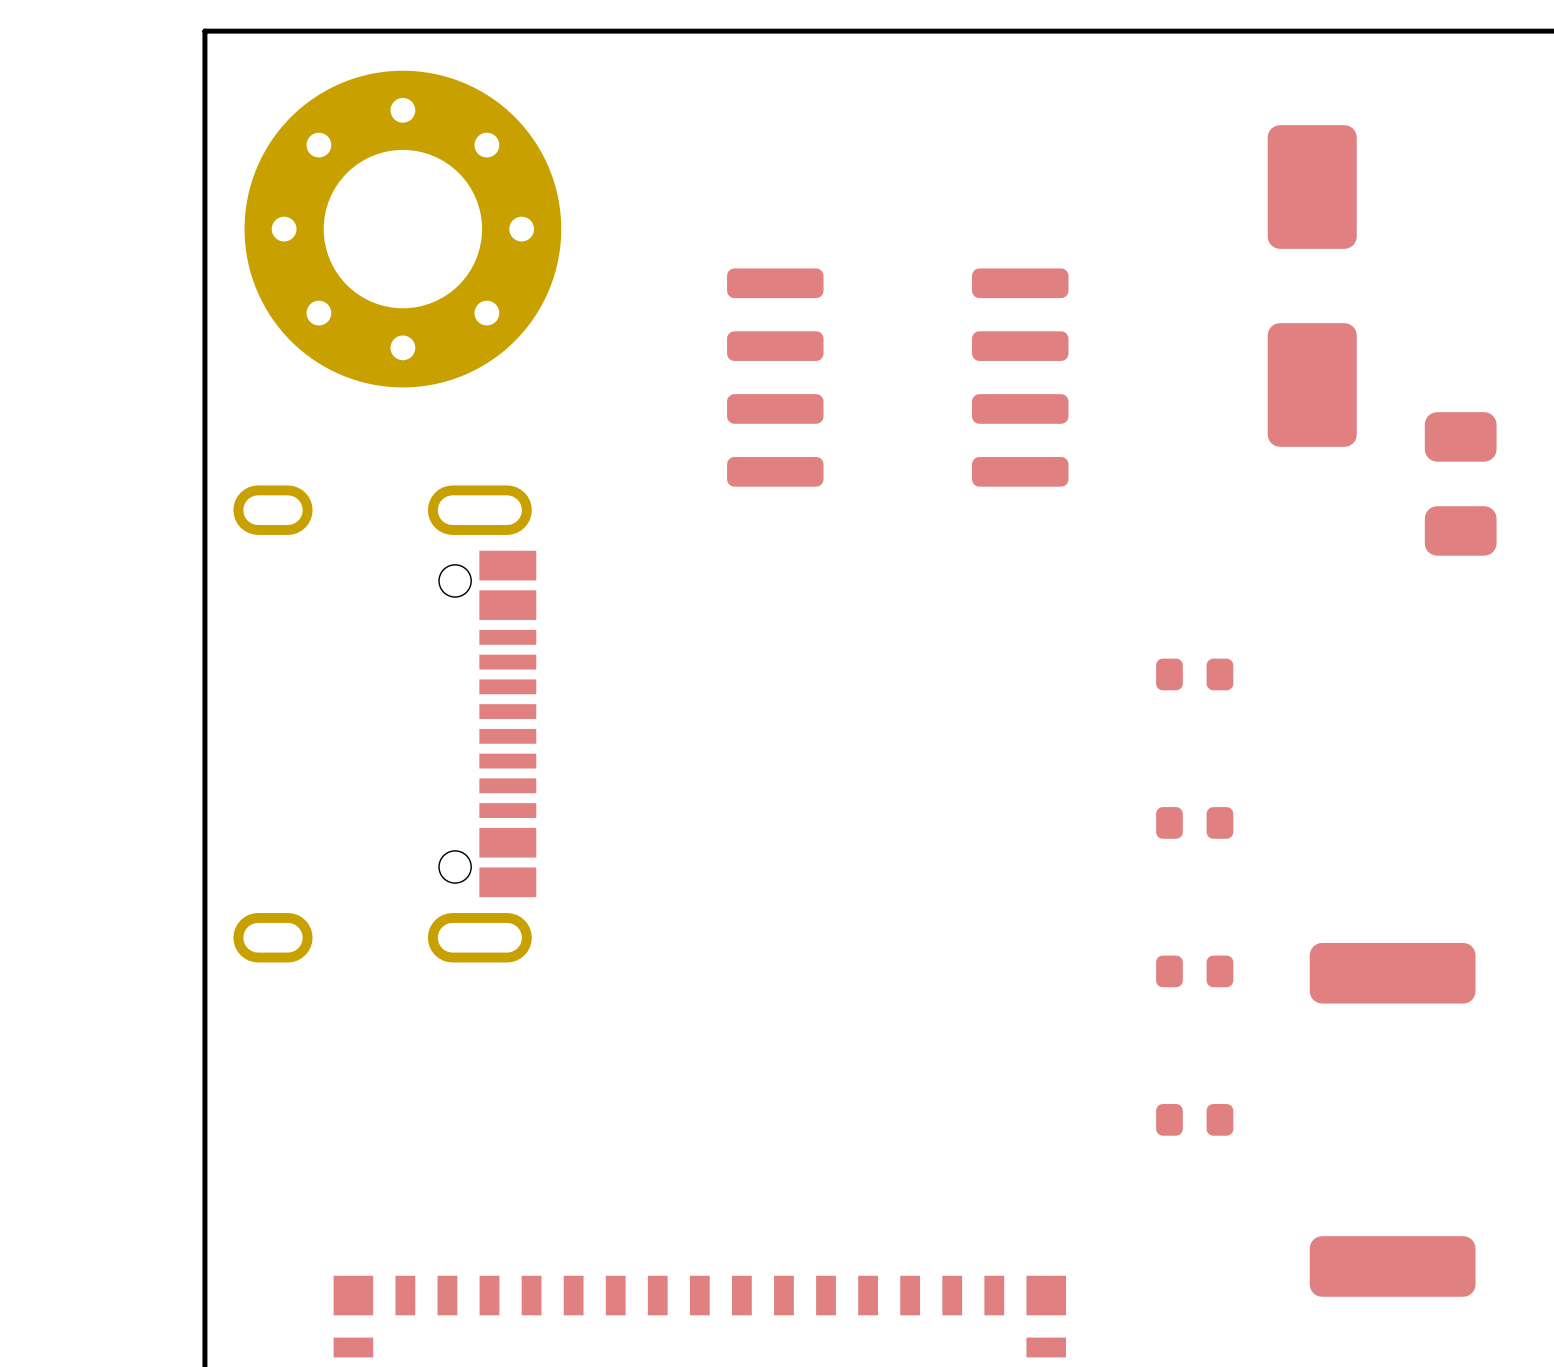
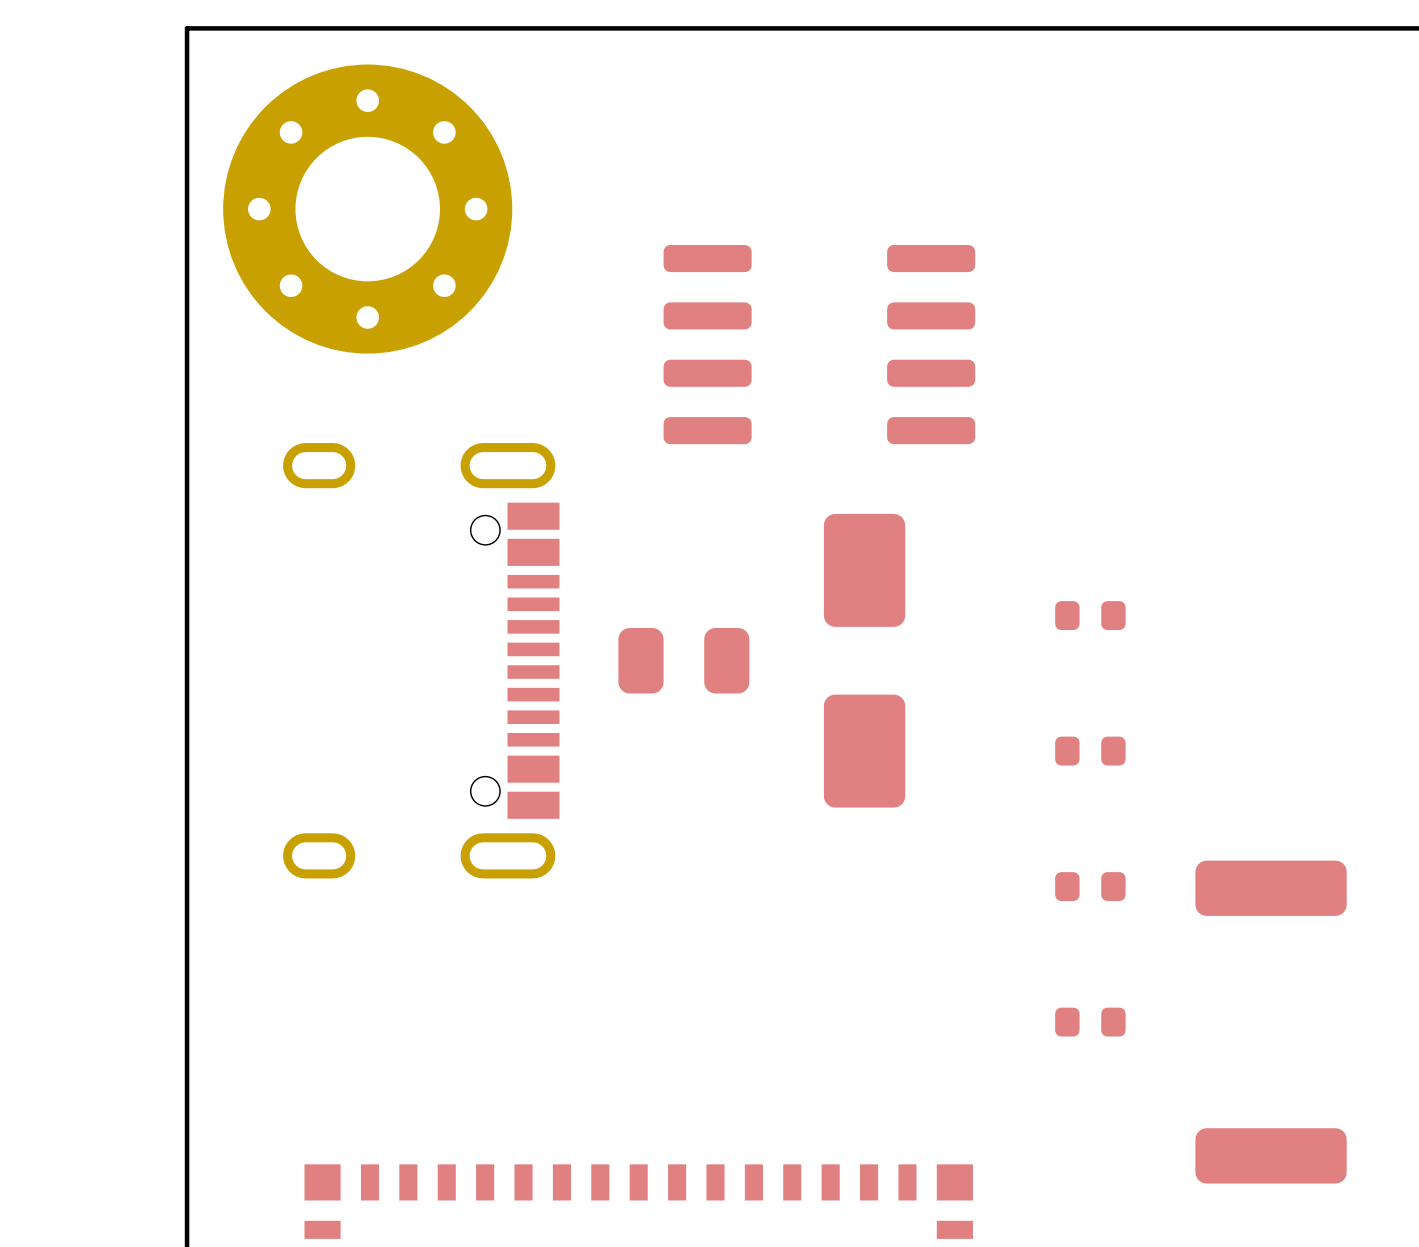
part position: (1312, 285) -> (864, 660)
part rotation: 0° (1460, 483) -> 90° clockwise (683, 660)
part position: (1460, 483) -> (683, 660)
part position: (384, 723) -> (421, 660)

